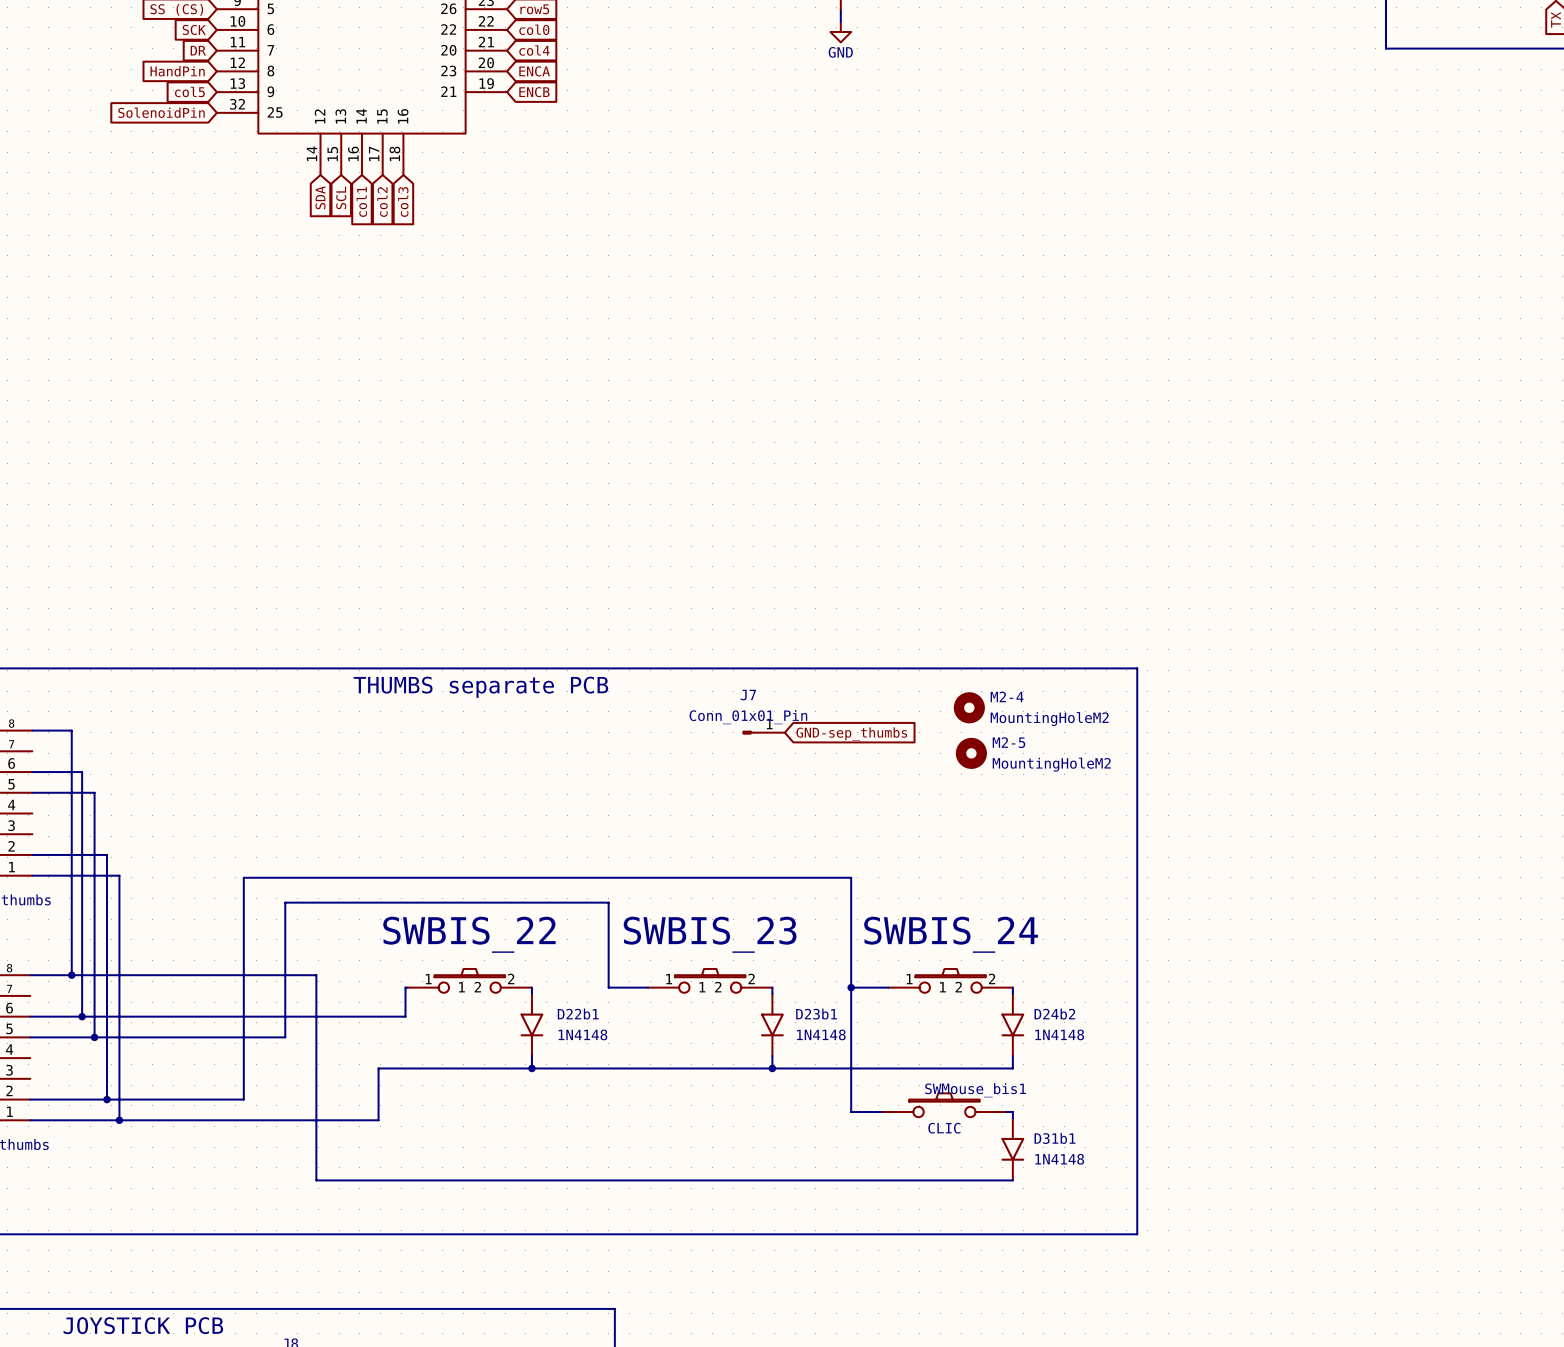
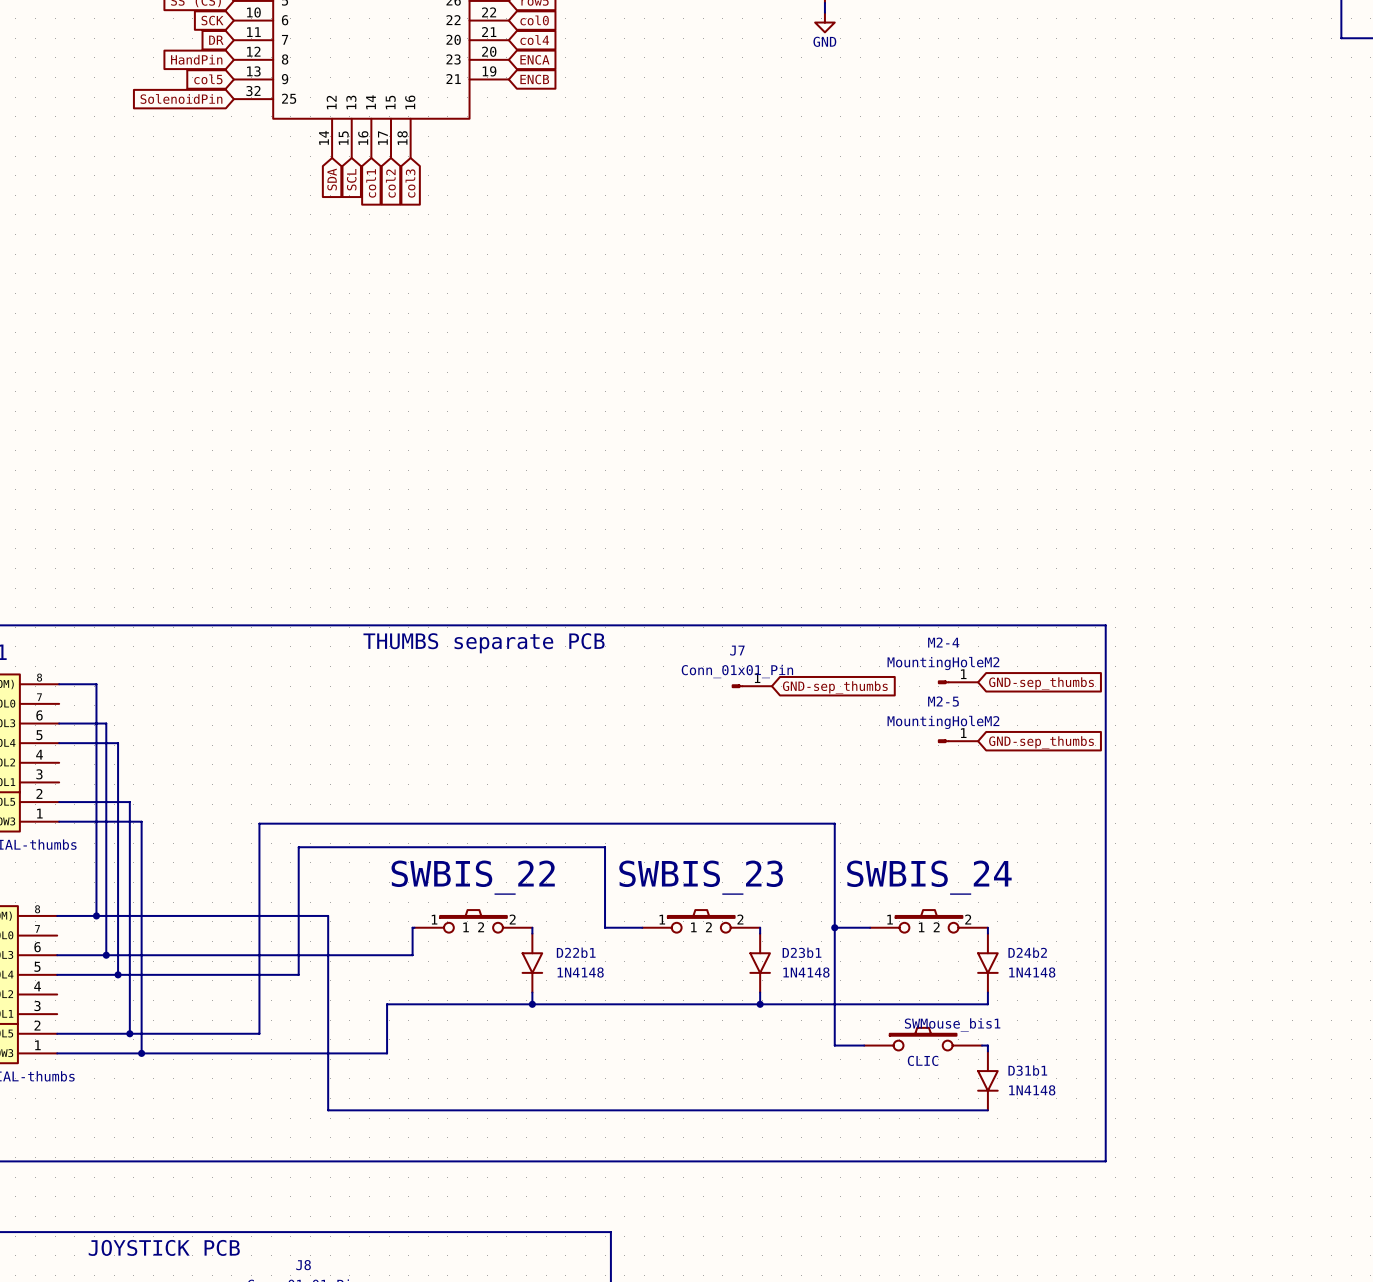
M2-4 symbol: [953, 692, 985, 724] -> [938, 680, 979, 684]
M2-4 name position: M2-4 (1007, 696) -> M2-4 (943, 642)
M2-4 value position: MountingHoleM2 (1049, 719) -> MountingHoleM2 (943, 663)
global label: none -> GND-sep_thumbs (1041, 683)
M2-5 symbol: [955, 737, 987, 769] -> [938, 739, 979, 743]
M2-5 name position: M2-5 (1008, 742) -> M2-5 (943, 701)
M2-5 value position: MountingHoleM2 (1051, 764) -> MountingHoleM2 (943, 722)
global label: none -> GND-sep_thumbs (1041, 742)

